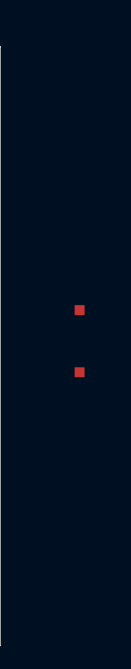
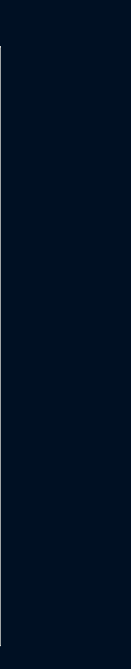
part: (79, 310) -> none
part: (79, 372) -> none

